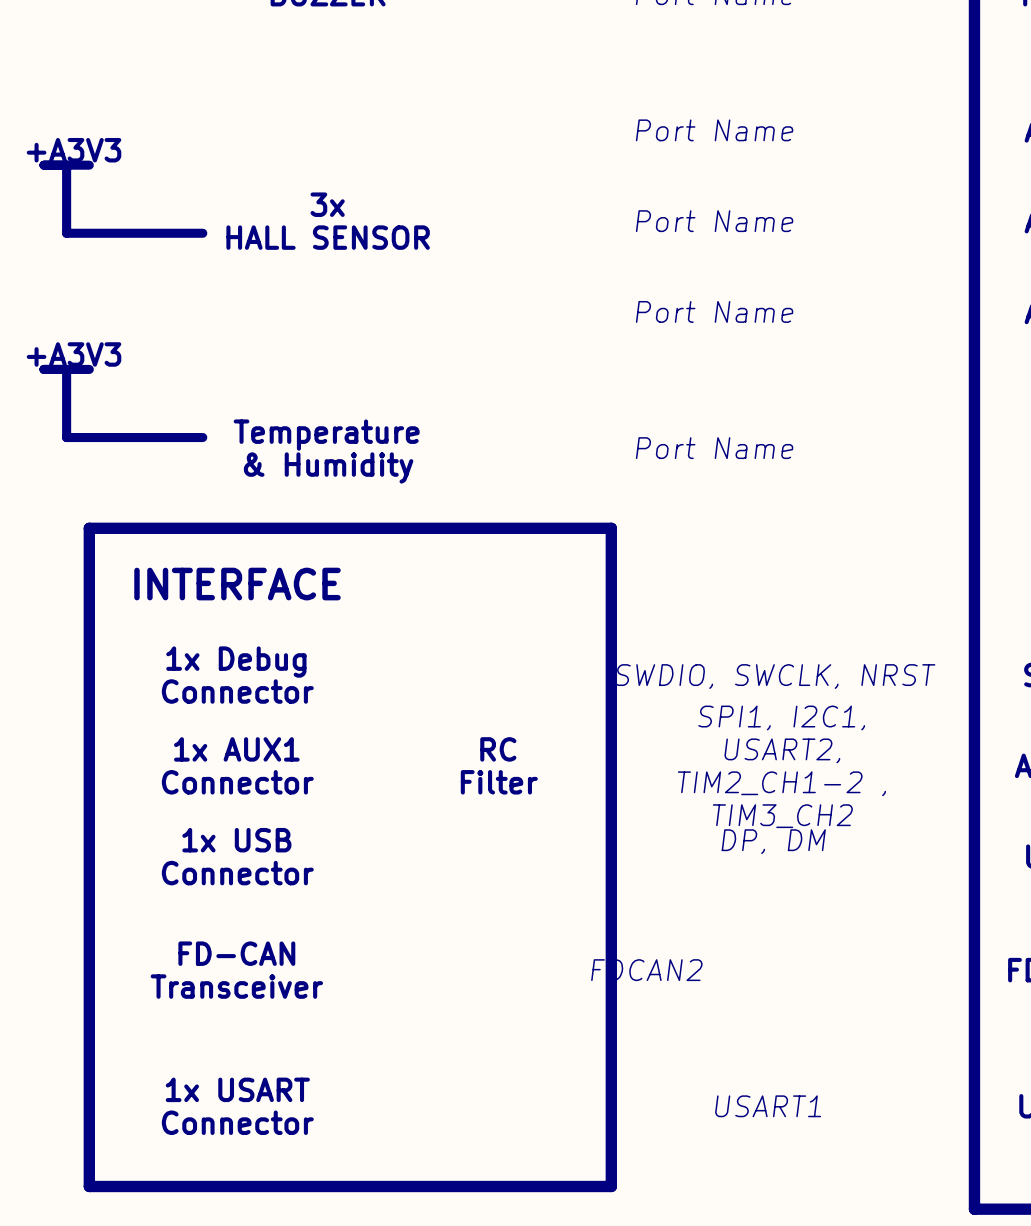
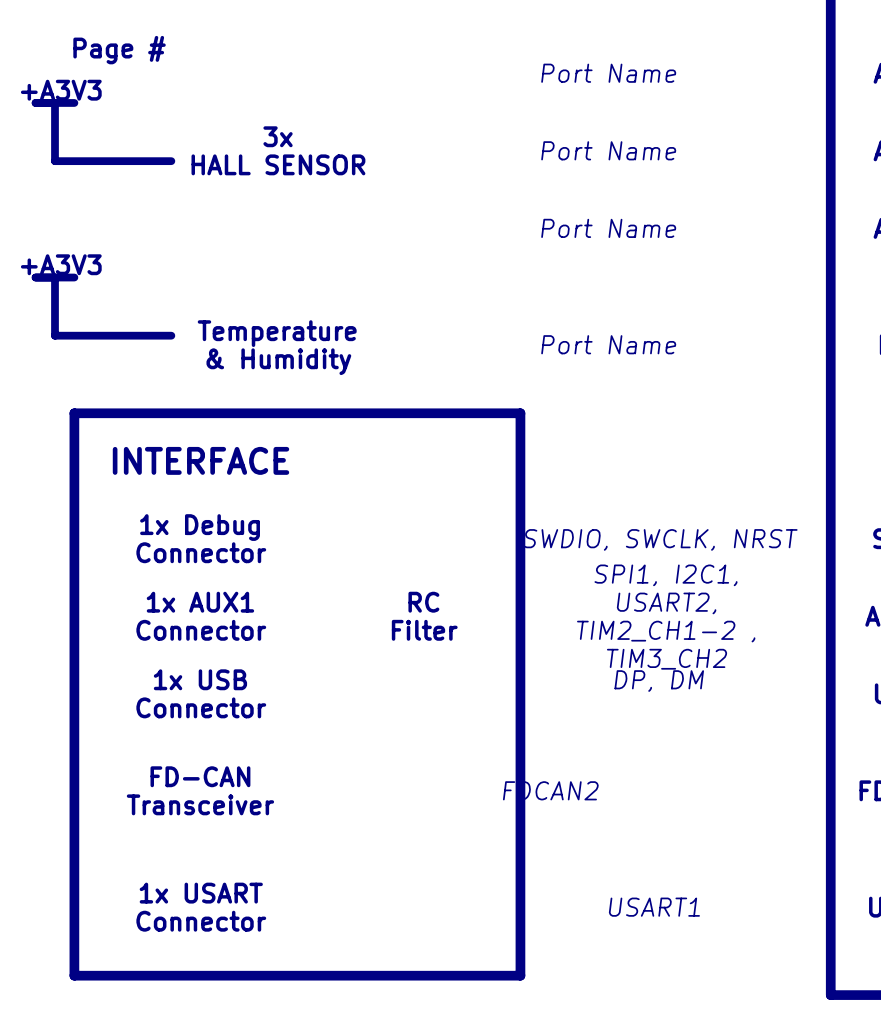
text: none -> Page # (119, 50)

